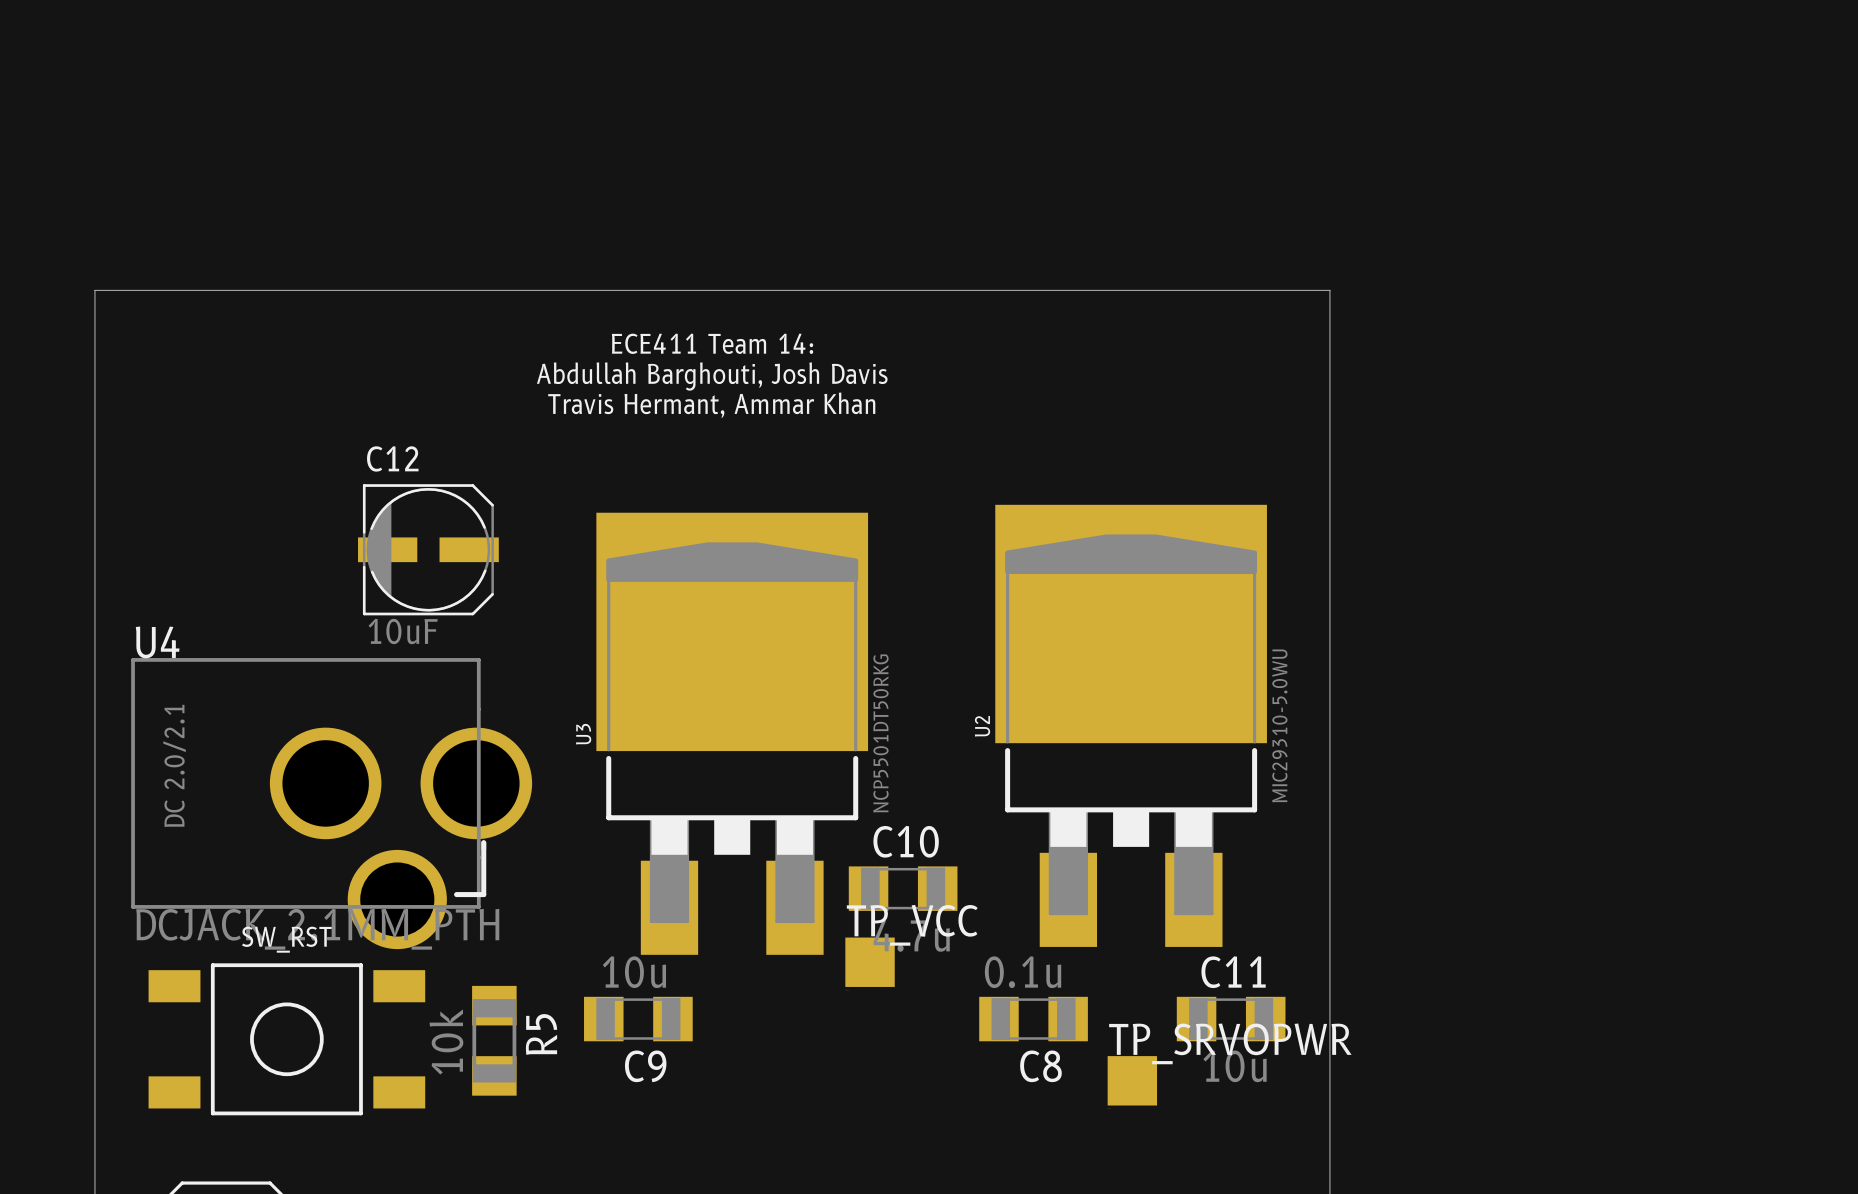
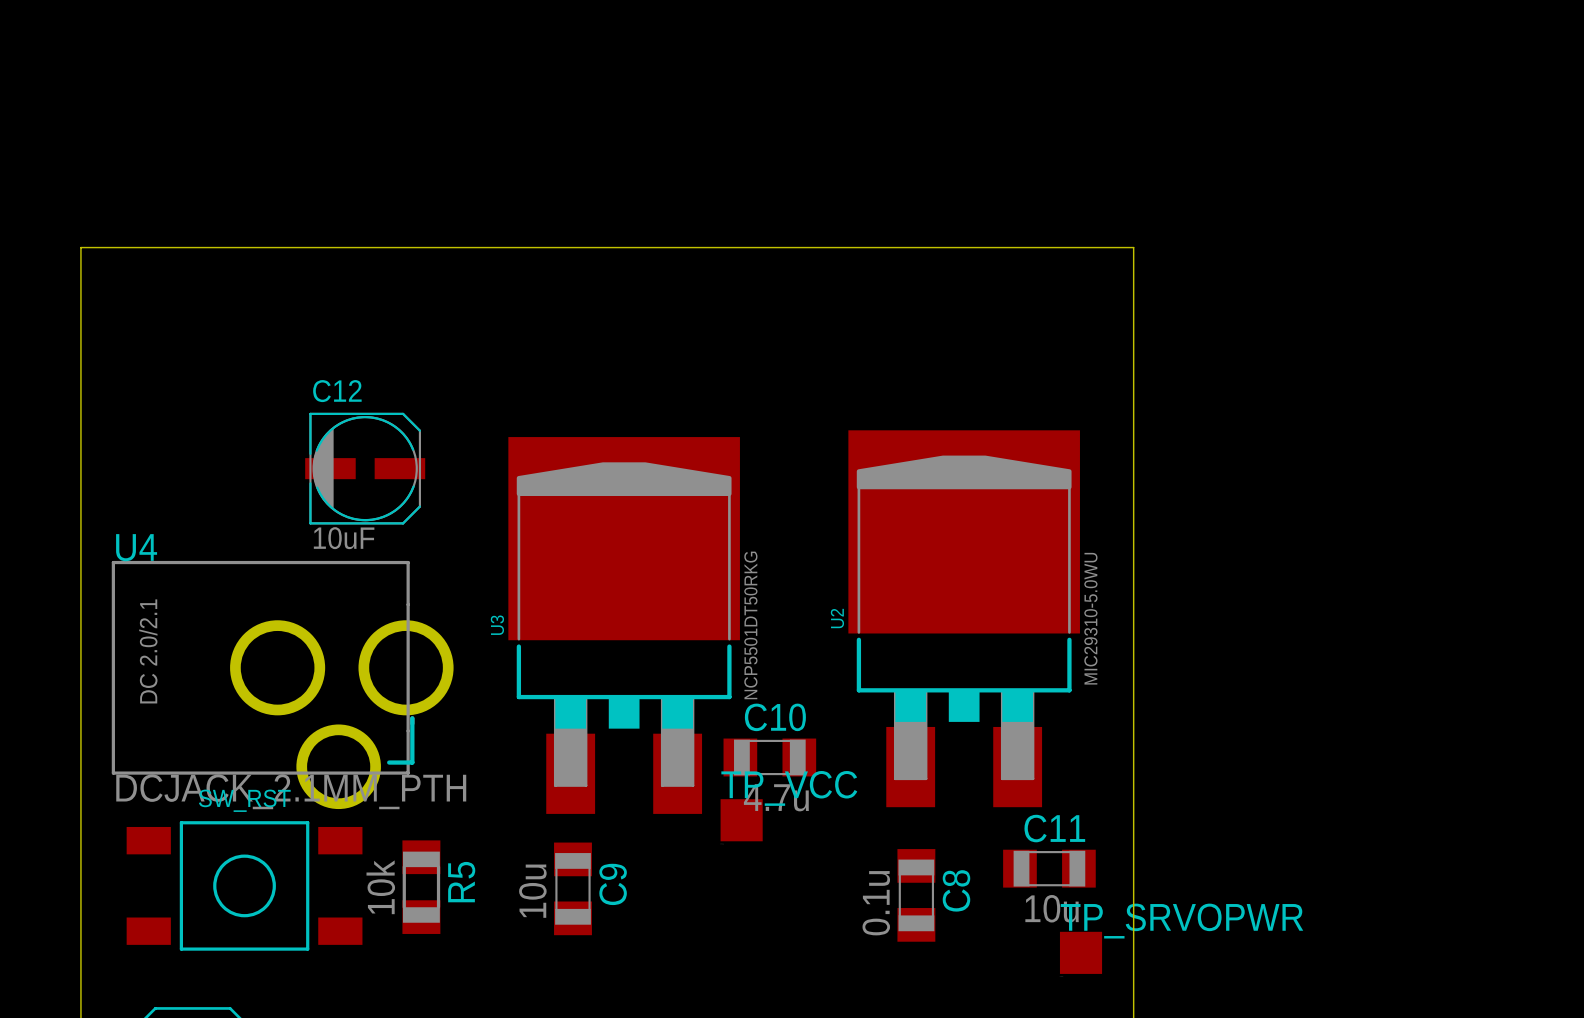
text: ECE411 Team 14: (712, 343) -> none
text: Abdullah Barghouti, Josh Davis (712, 376) -> none
text: Travis Hermant, Ammar Khan (711, 405) -> none
C9 value position: 10u (634, 972) -> 10u (532, 891)
C8 value position: 0.1u (1023, 972) -> 0.1u (876, 903)
C9 rotation: 0° (638, 1019) -> 90° clockwise (572, 888)
C8 rotation: 0° (1033, 1019) -> 90° clockwise (916, 895)
C9 name position: C9 (645, 1066) -> C9 (613, 884)
C8 name position: C8 (1040, 1066) -> C8 (956, 890)
TP_SRVOPWR position: (1132, 1080) -> (1081, 952)

